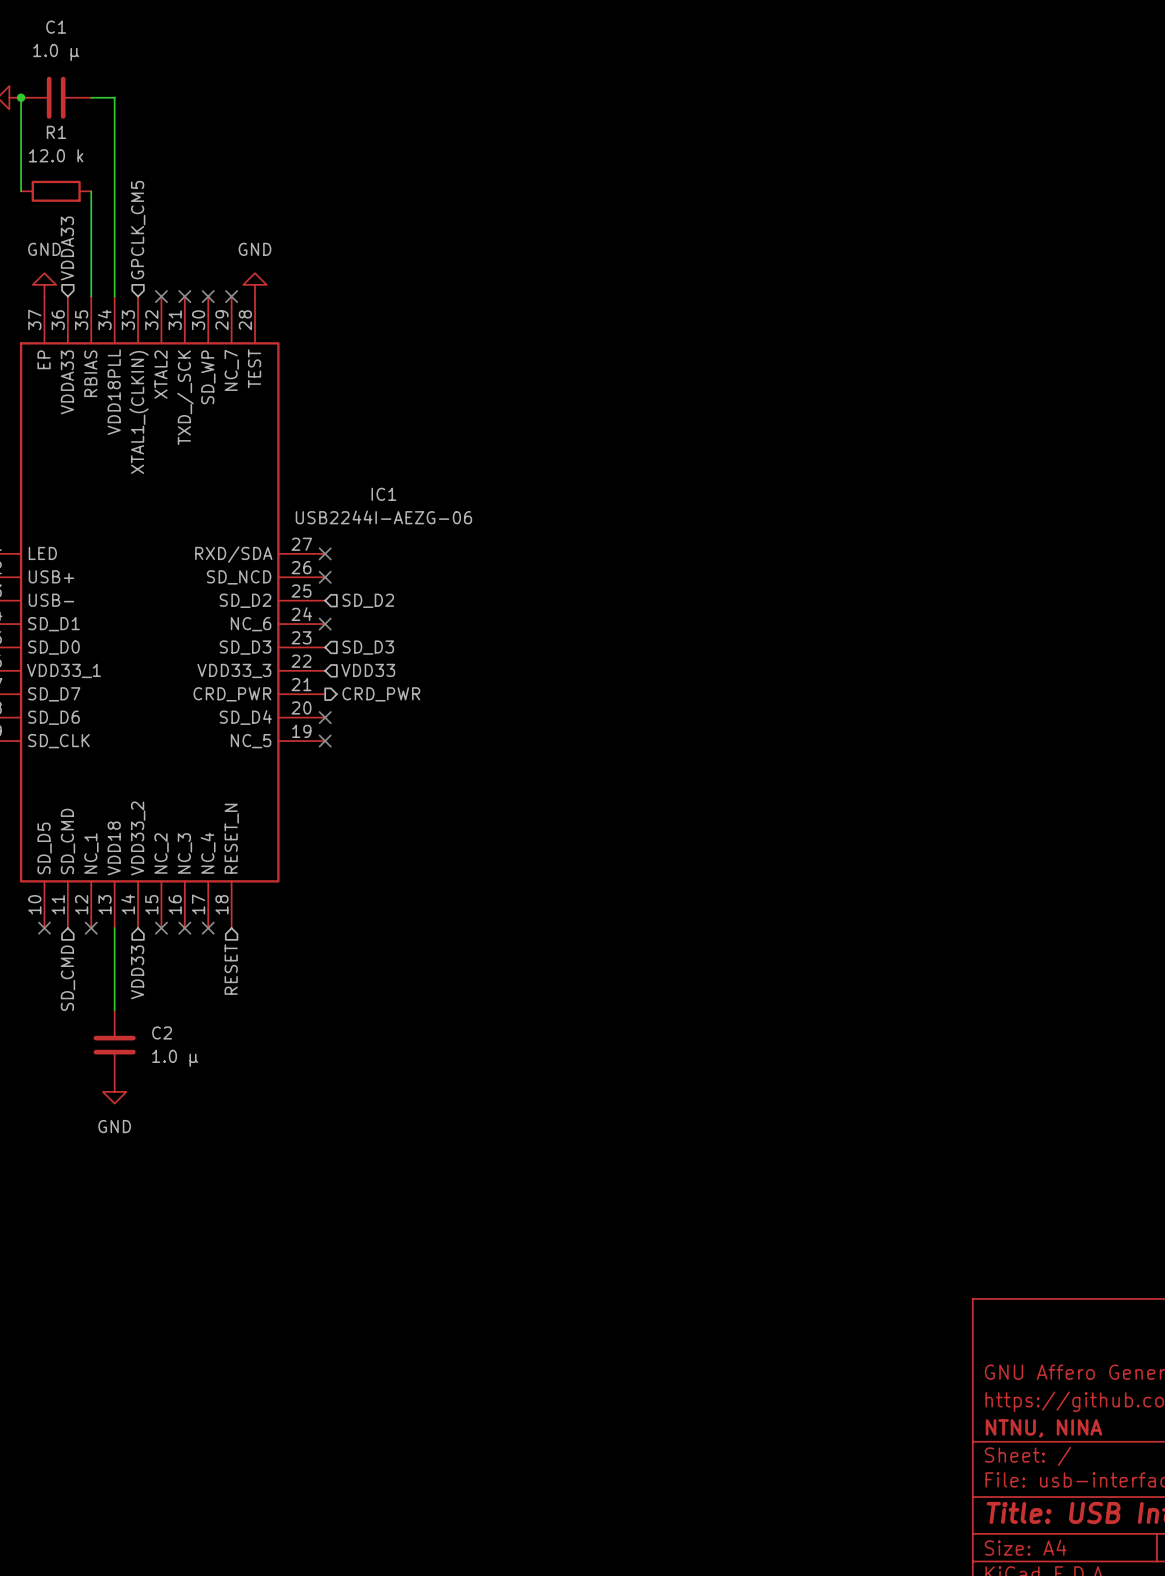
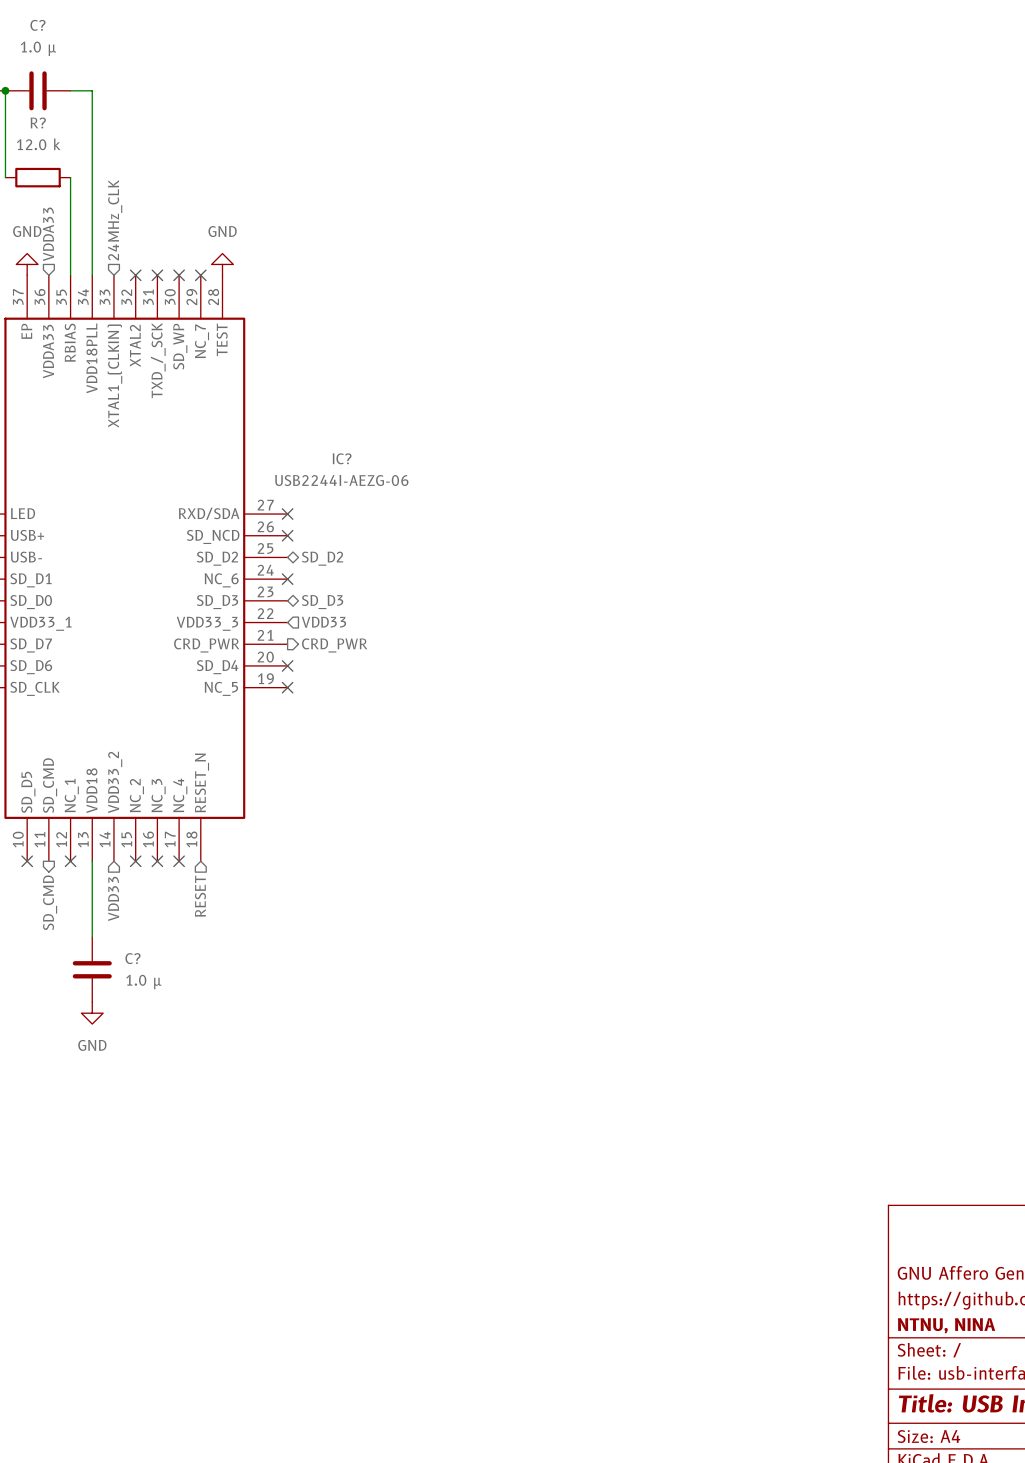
C1 name: C1 (56, 27) -> C? (37, 25)
R1 name: R1 (56, 132) -> R? (38, 123)
hierarchical label: GPCLK_CM5 (138, 230) -> 24MHz_CLK (115, 220)
IC1 name: IC1 (383, 494) -> IC? (342, 458)
hierarchical label shape: input (368, 600) -> bidirectional (322, 558)
hierarchical label shape: input (368, 647) -> bidirectional (322, 602)
hierarchical label shape: input (67, 978) -> output (50, 902)
C2 name: C2 (162, 1032) -> C? (133, 958)

